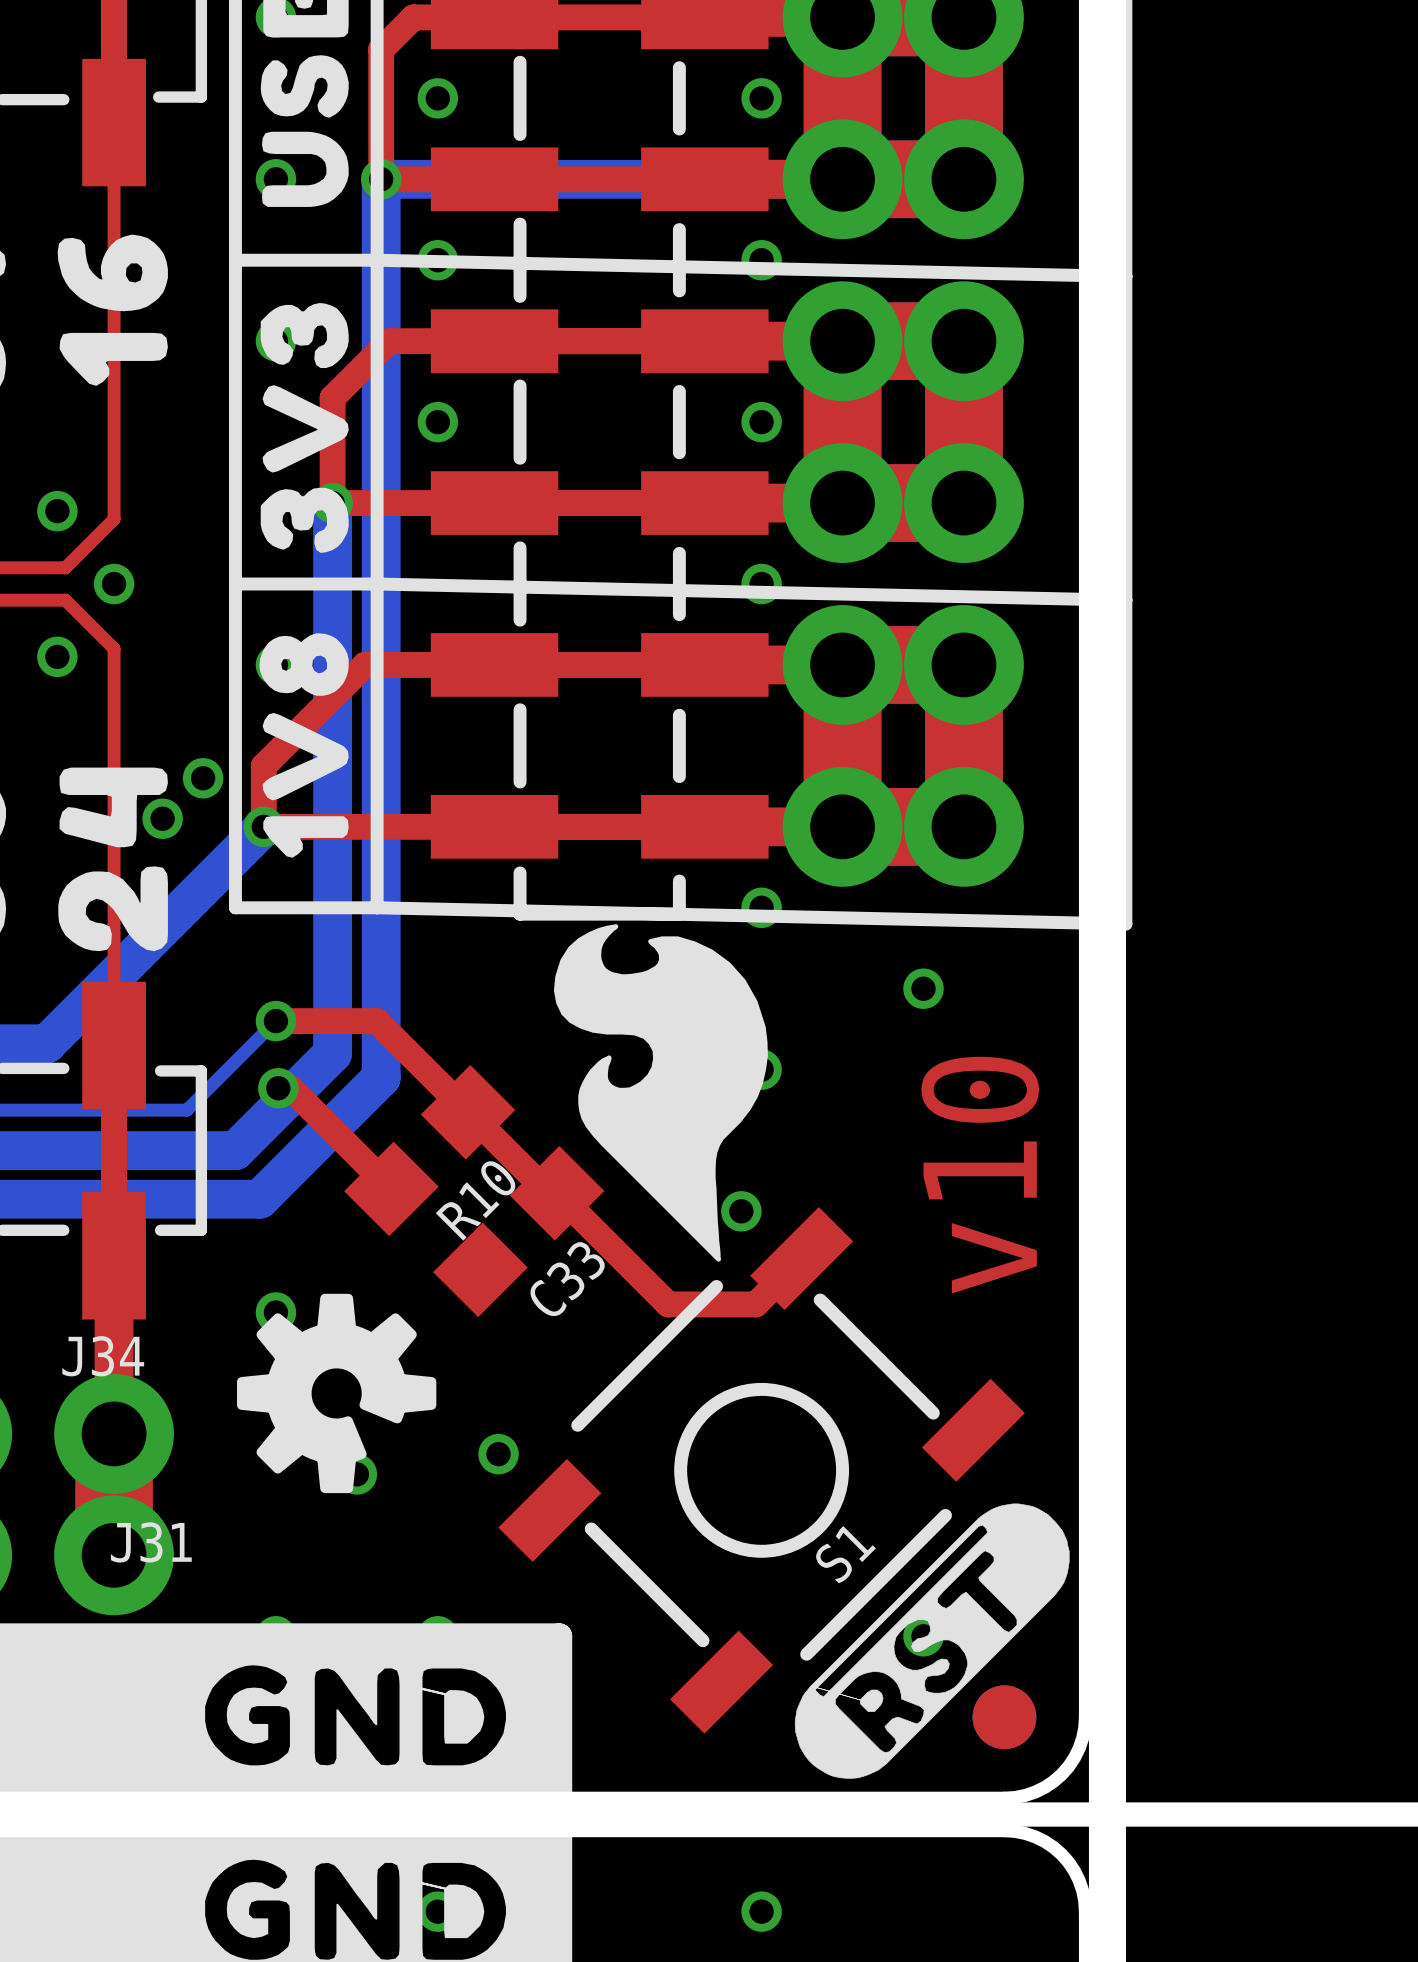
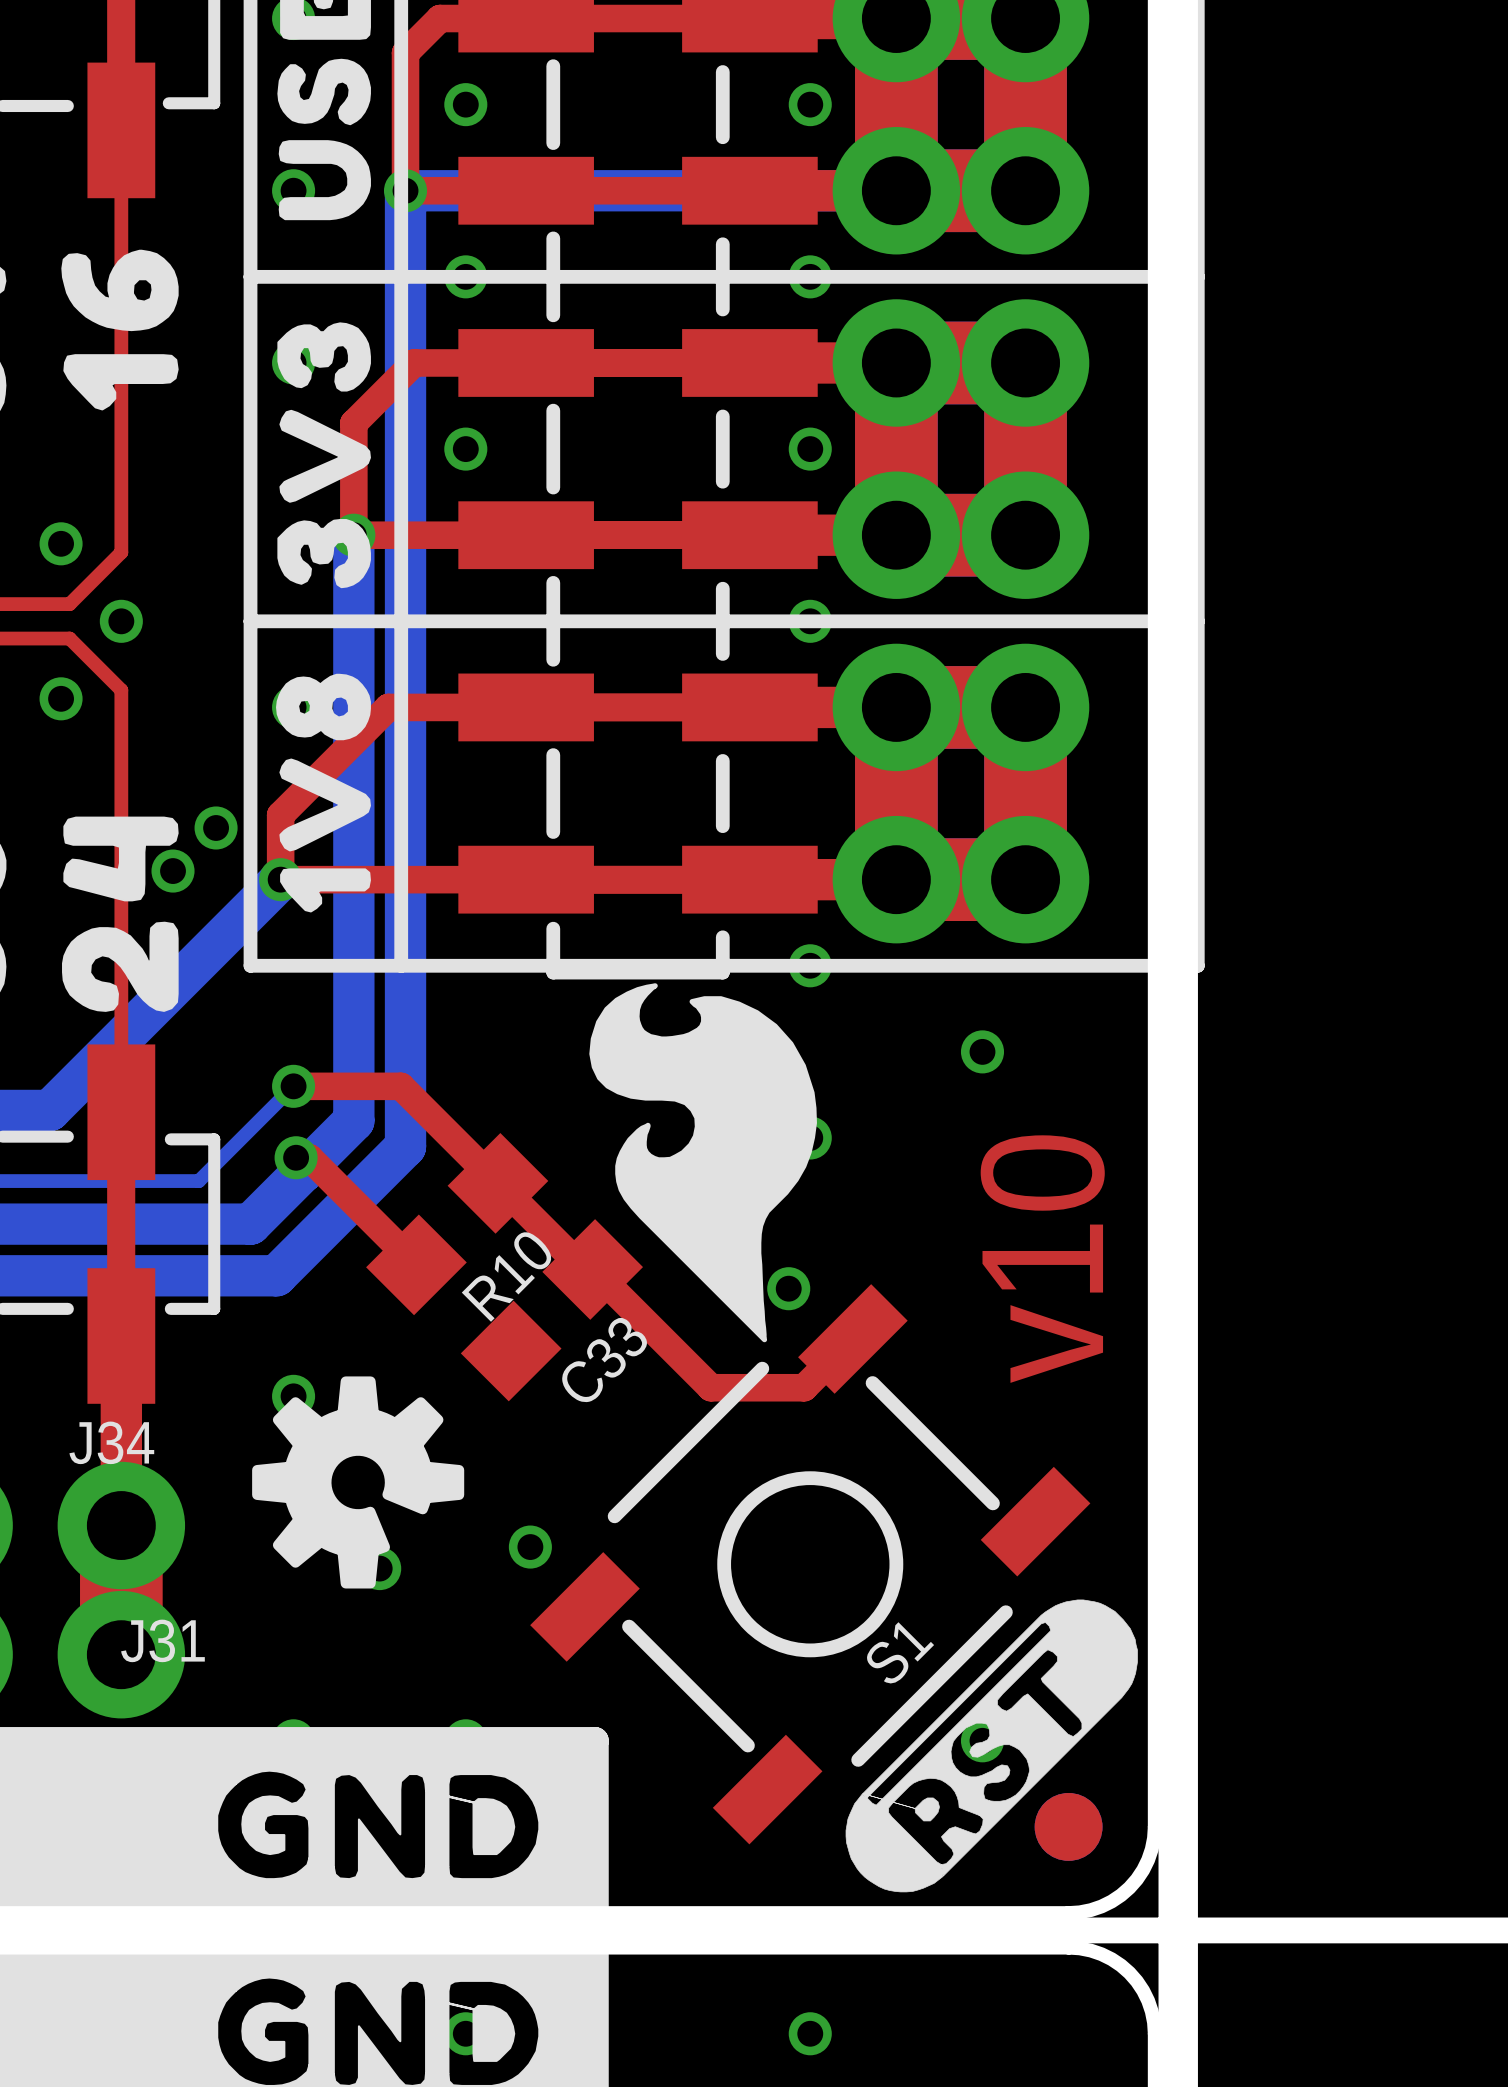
line: (377, 260) (1125, 276) -> (401, 276) (1197, 276)
line: (377, 584) (1125, 600) -> (401, 621) (1197, 621)
line: (377, 907) (1125, 923) (1125, 907) -> (401, 965) (1197, 965)

